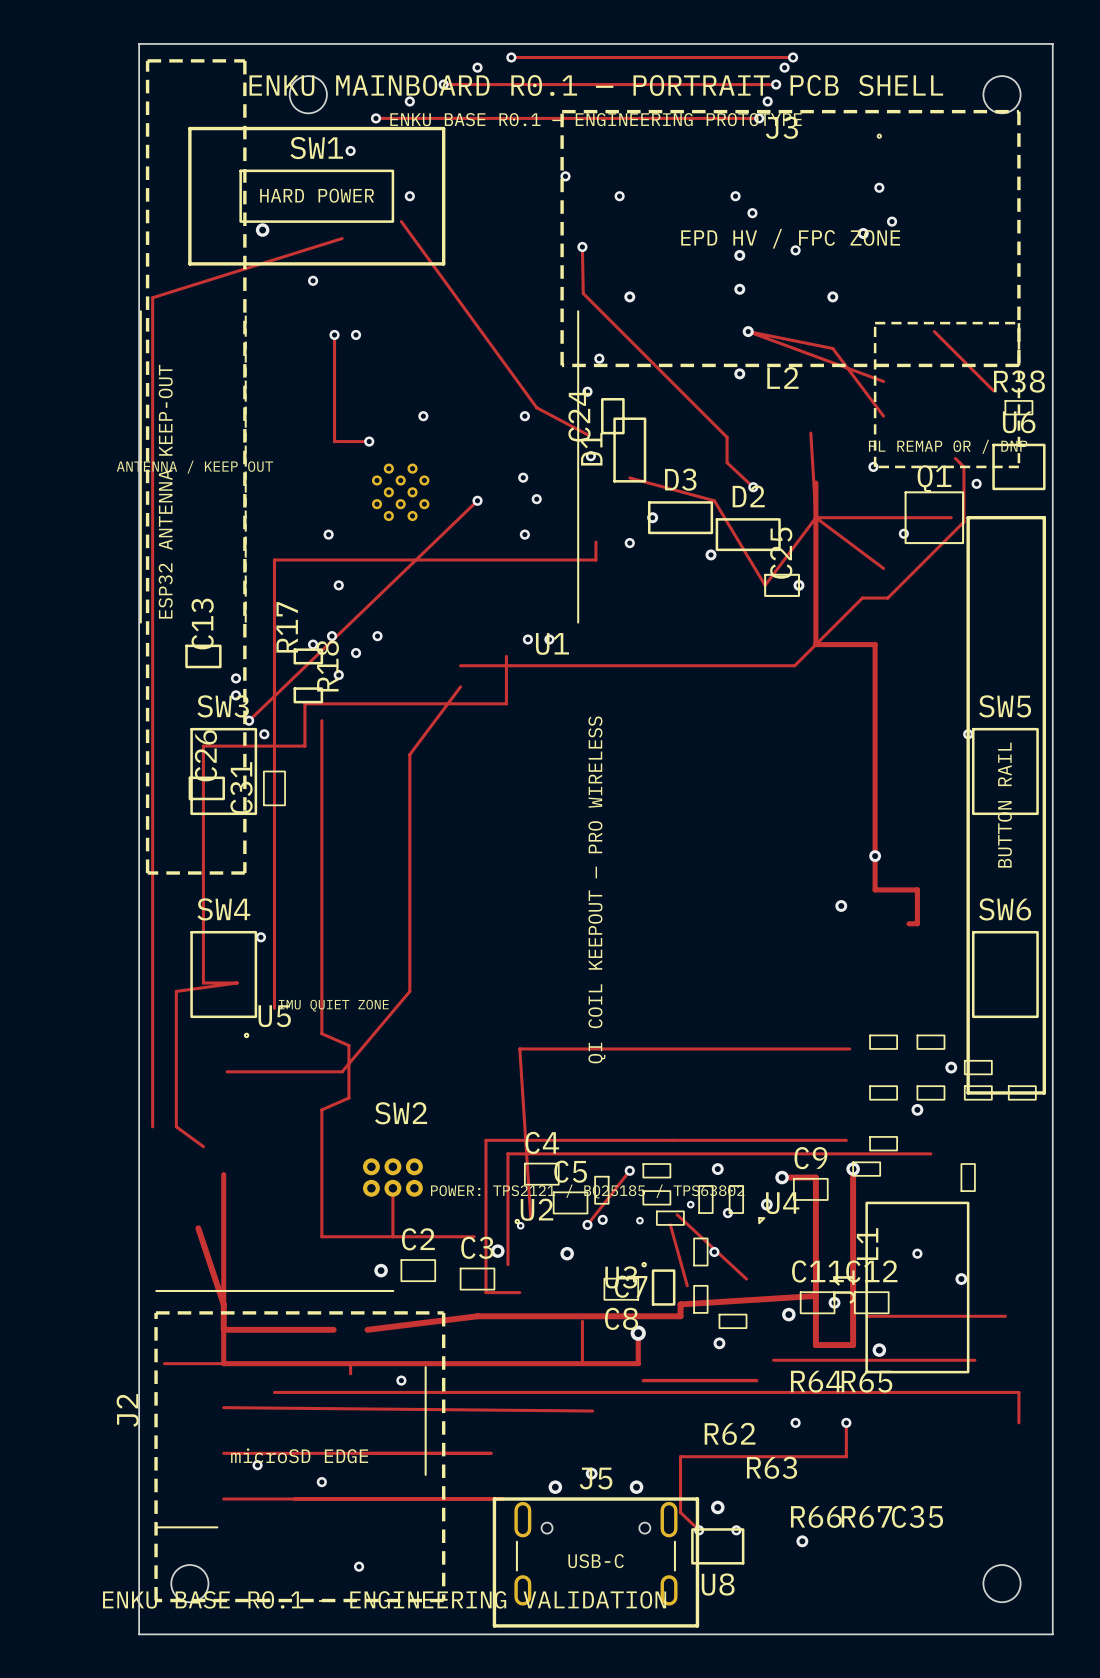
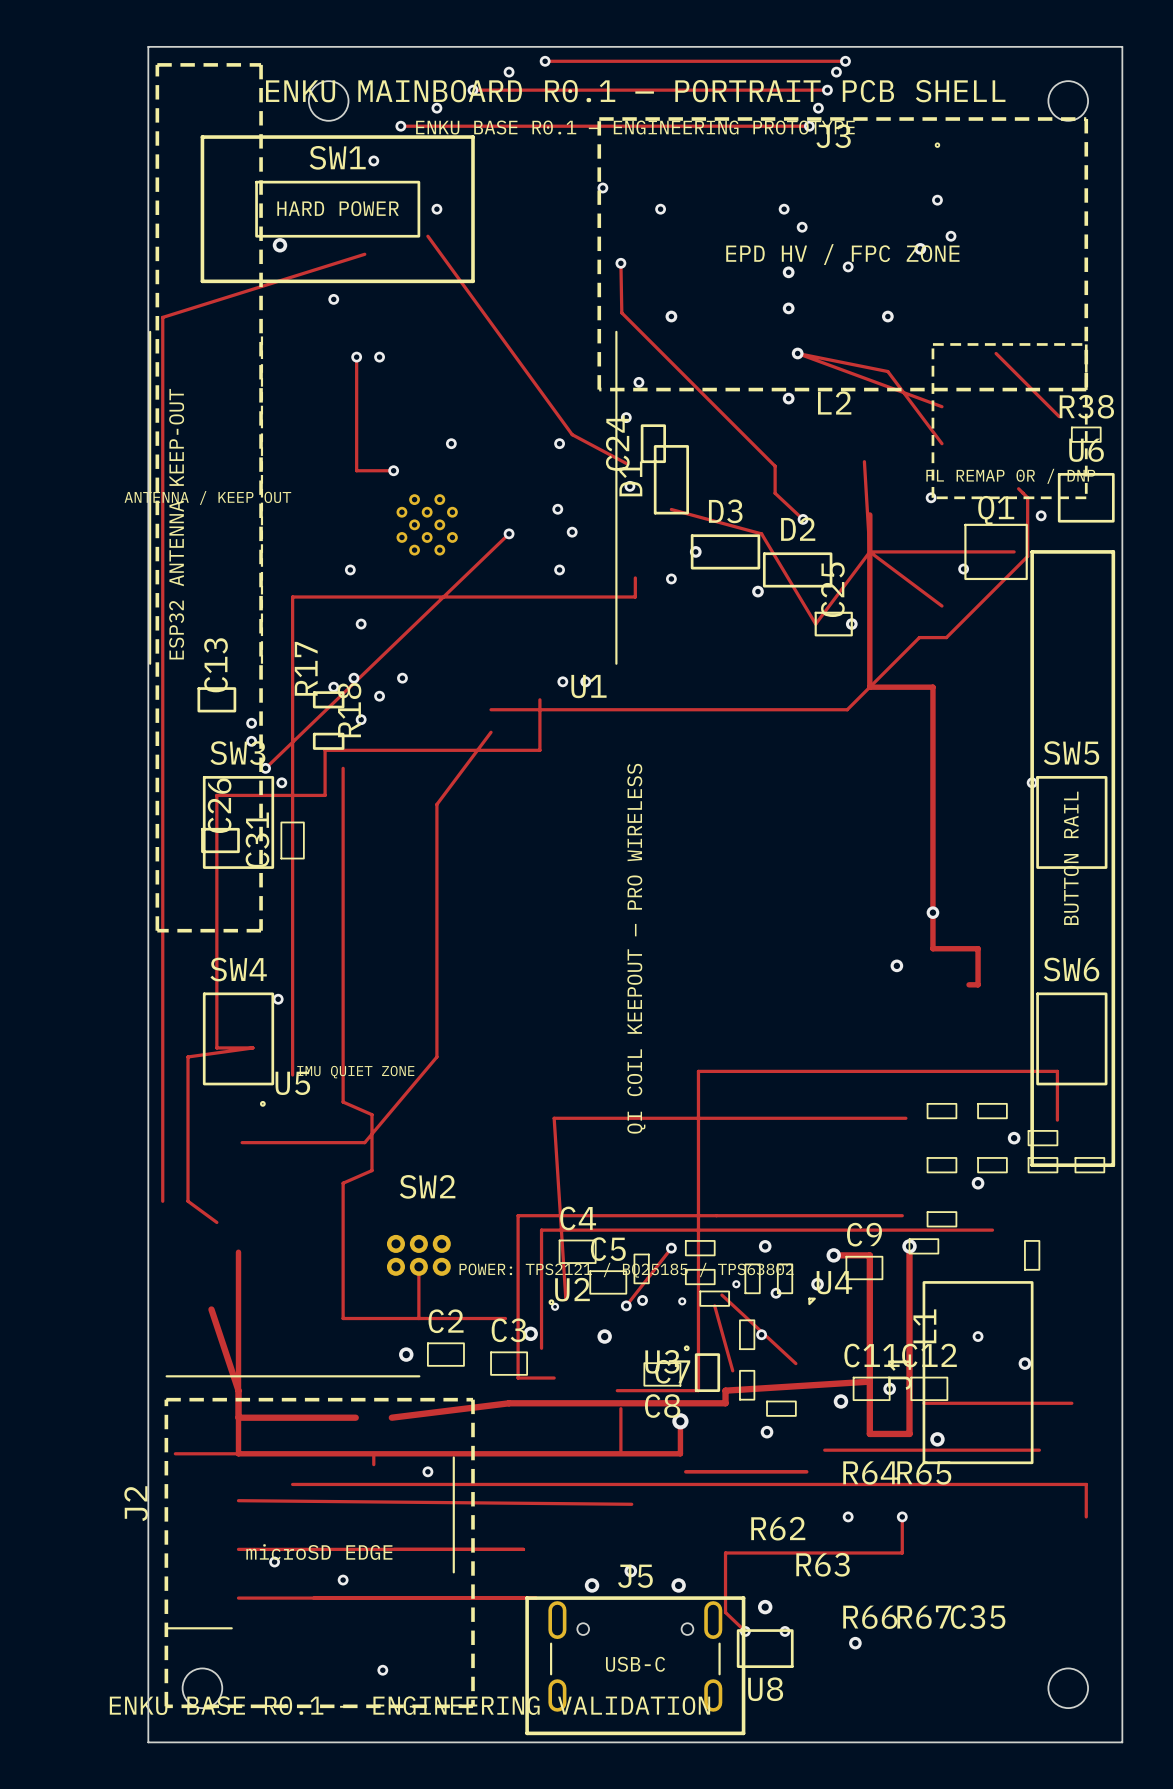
track: none -> (1057, 1120) (1057, 1071) (698, 1071) (698, 1390) (617, 1390)

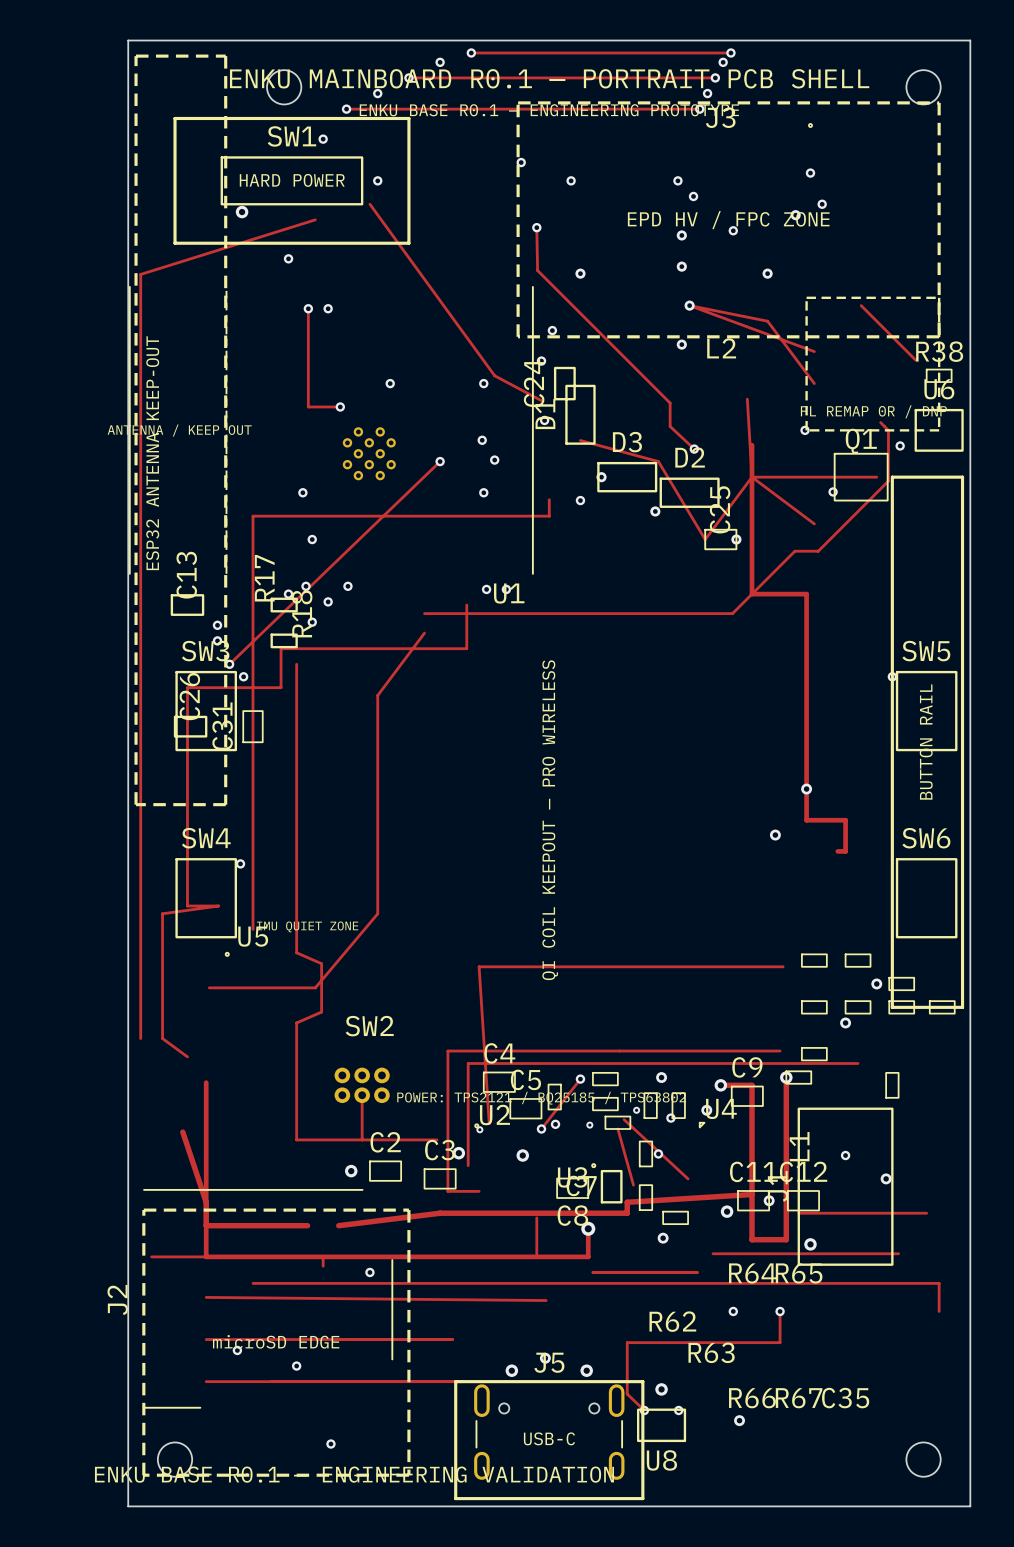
track: (1057, 1120) (1057, 1071) (698, 1071) (698, 1390) (617, 1390) -> none

